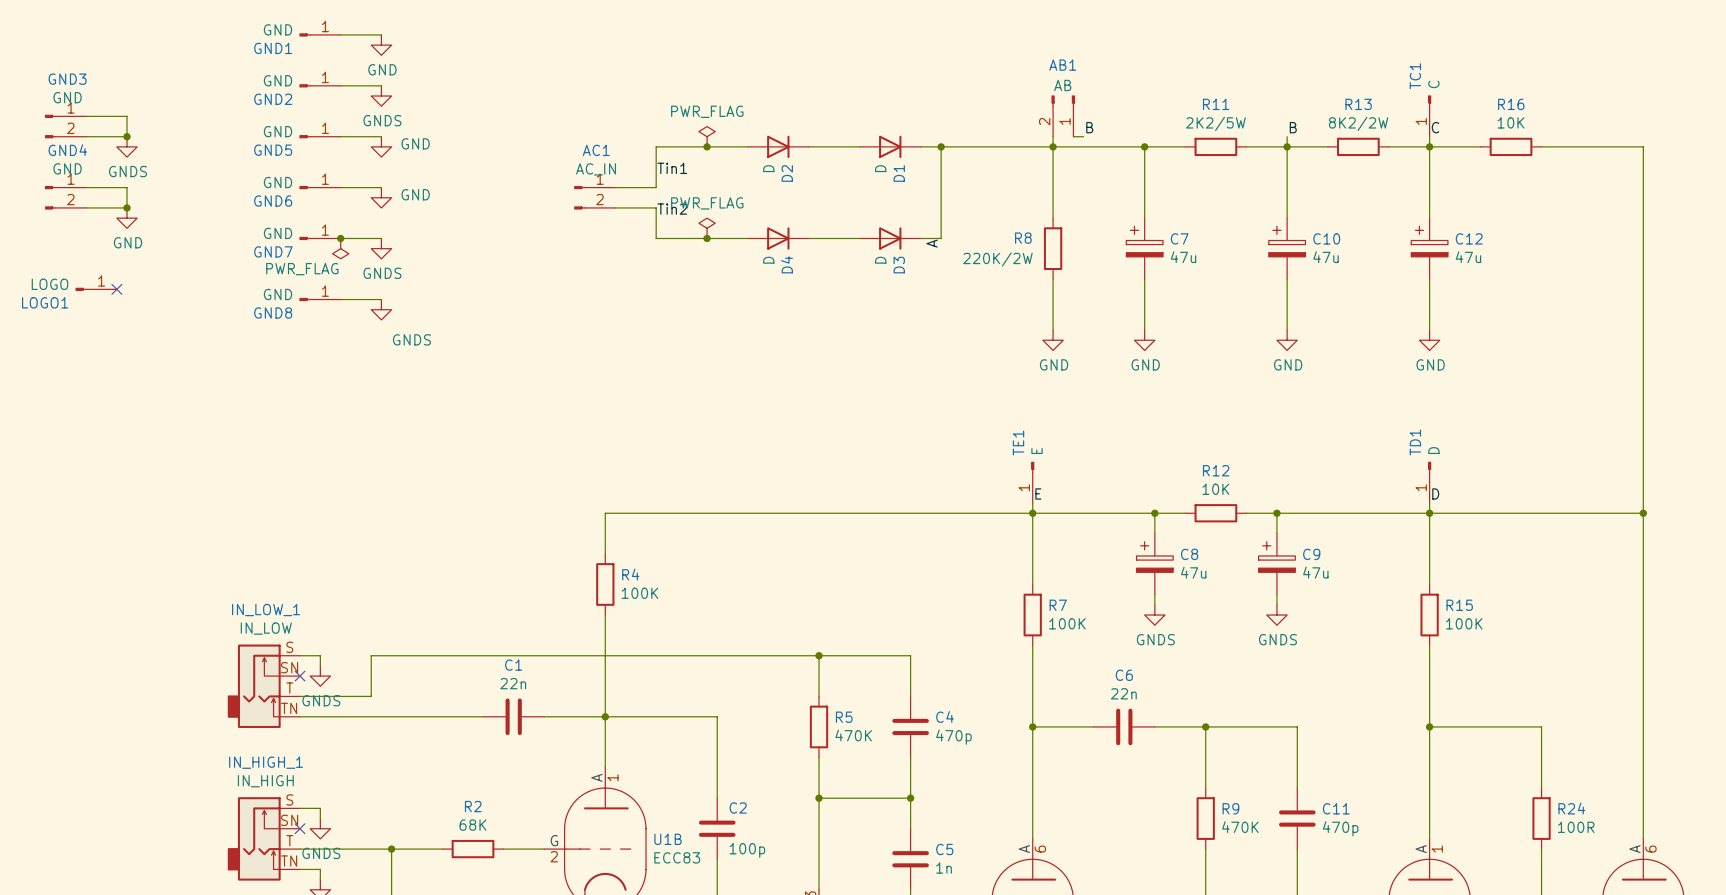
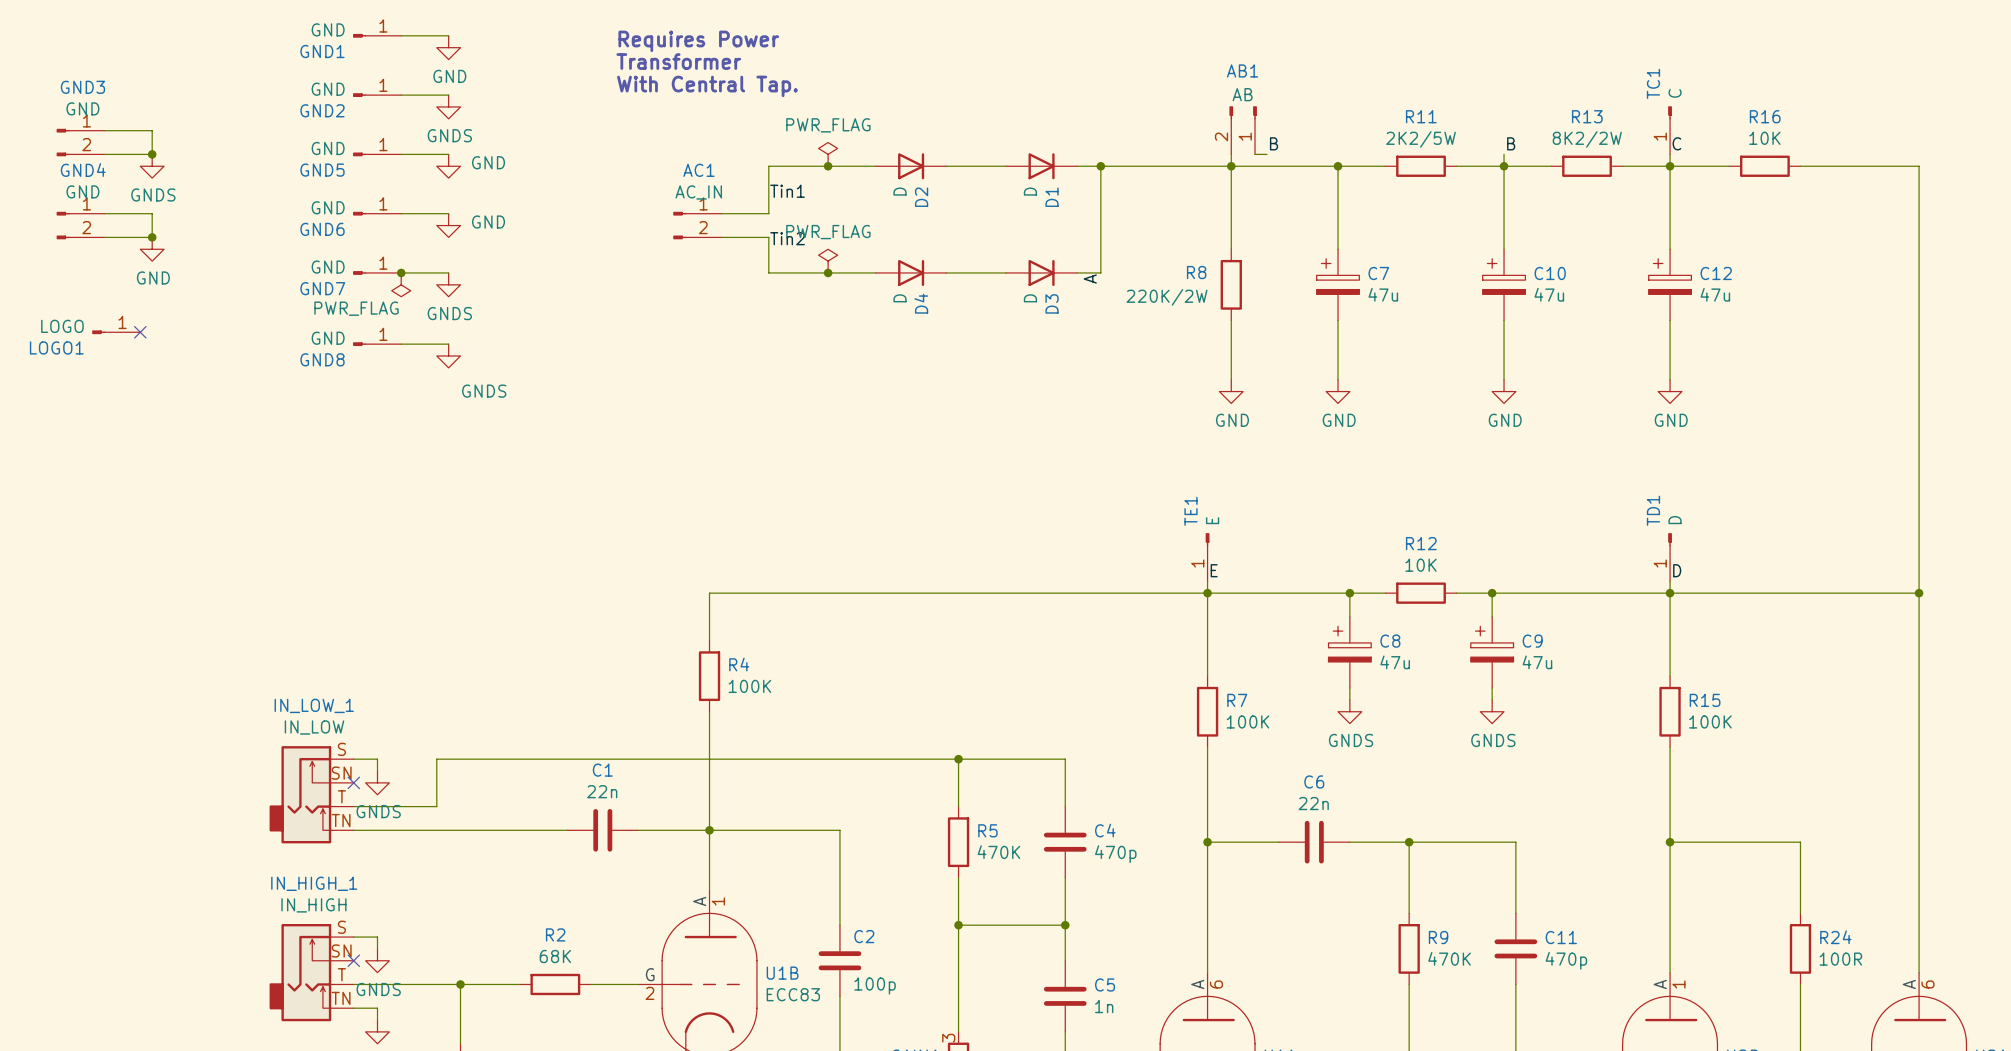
text: none -> Requires Power (698, 41)
text: none -> Transformer (678, 61)
text: none -> With Central Tap. (707, 86)

